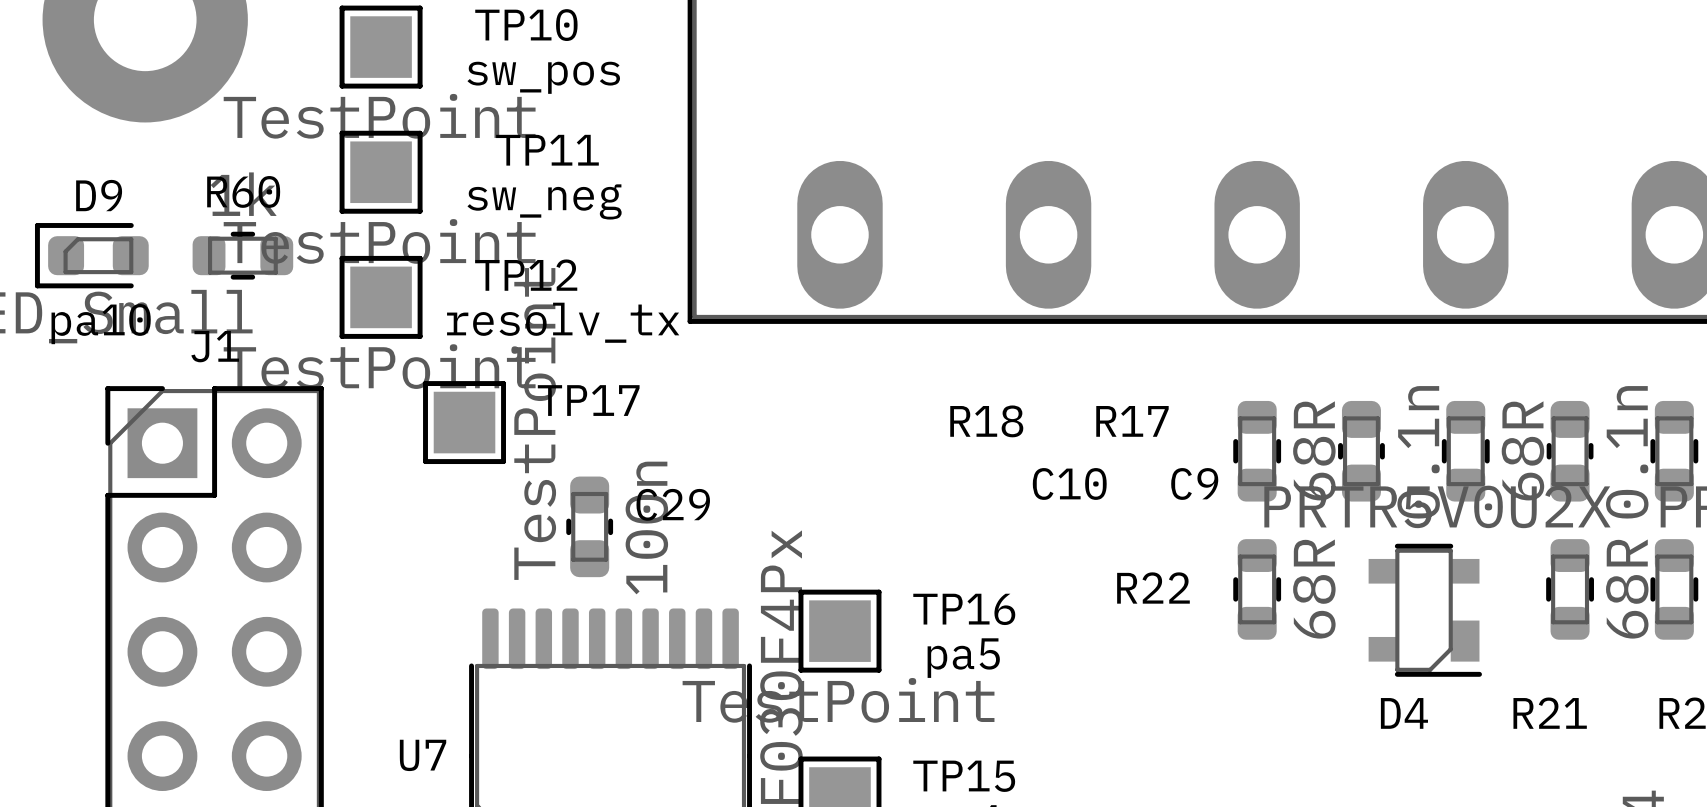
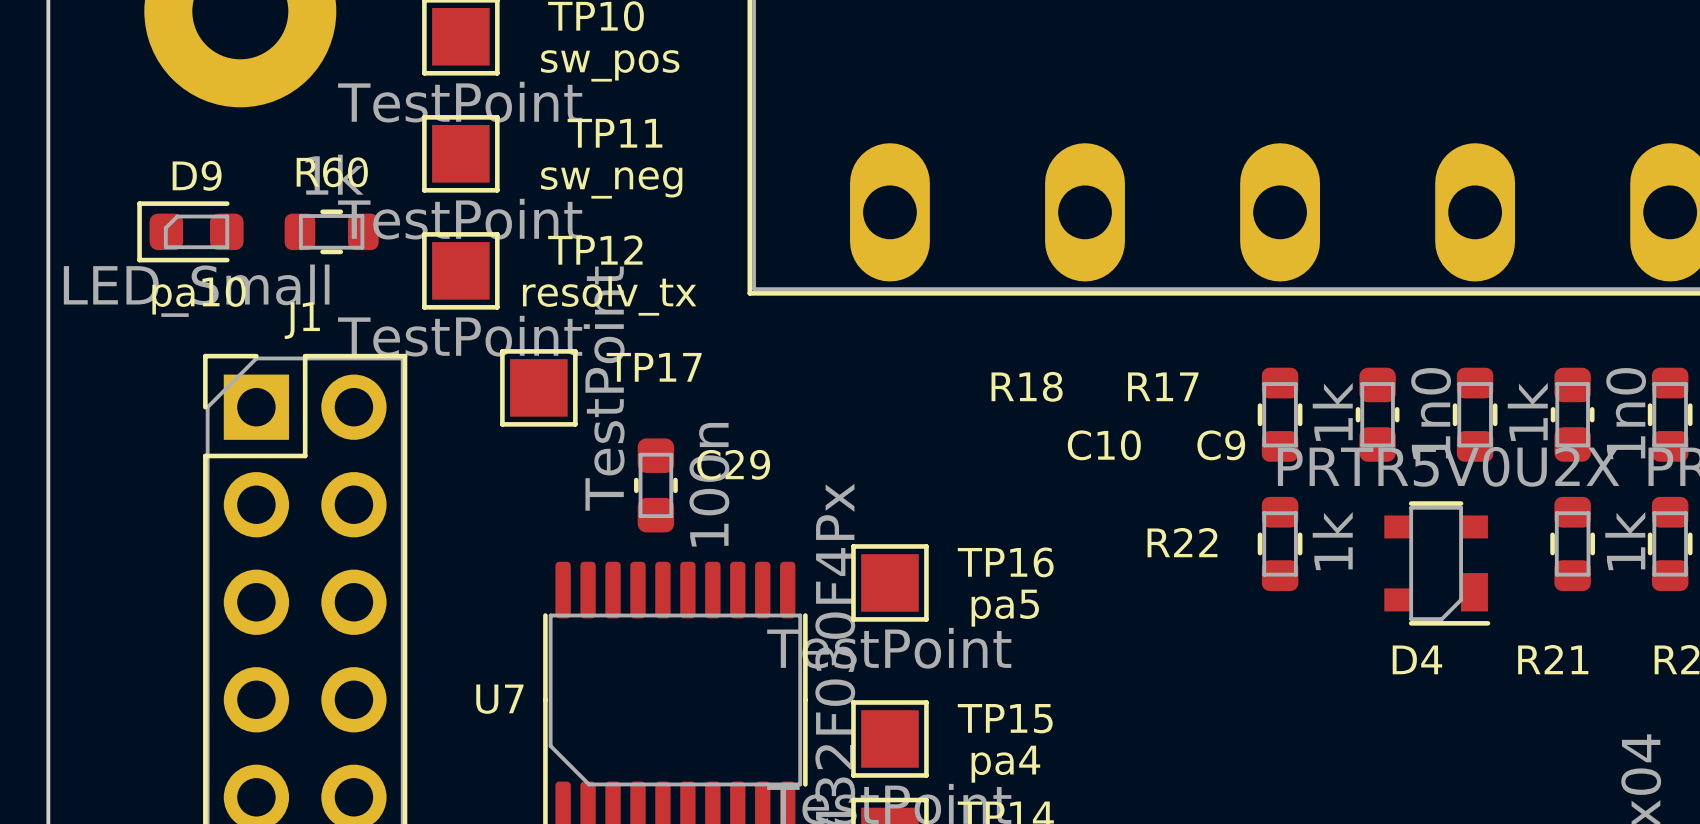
R18 value: 68R (1314, 450) -> 1k (1332, 411)
R17 value: 68R (1522, 450) -> 1k (1527, 411)
C10 value: 0.1n (1418, 452) -> 1n0 (1431, 413)
C9 value: 0.1n (1627, 452) -> 1n0 (1626, 413)
R22 value: 68R (1314, 589) -> 1k (1332, 541)
R21 value: 68R (1627, 589) -> 1k (1625, 541)

